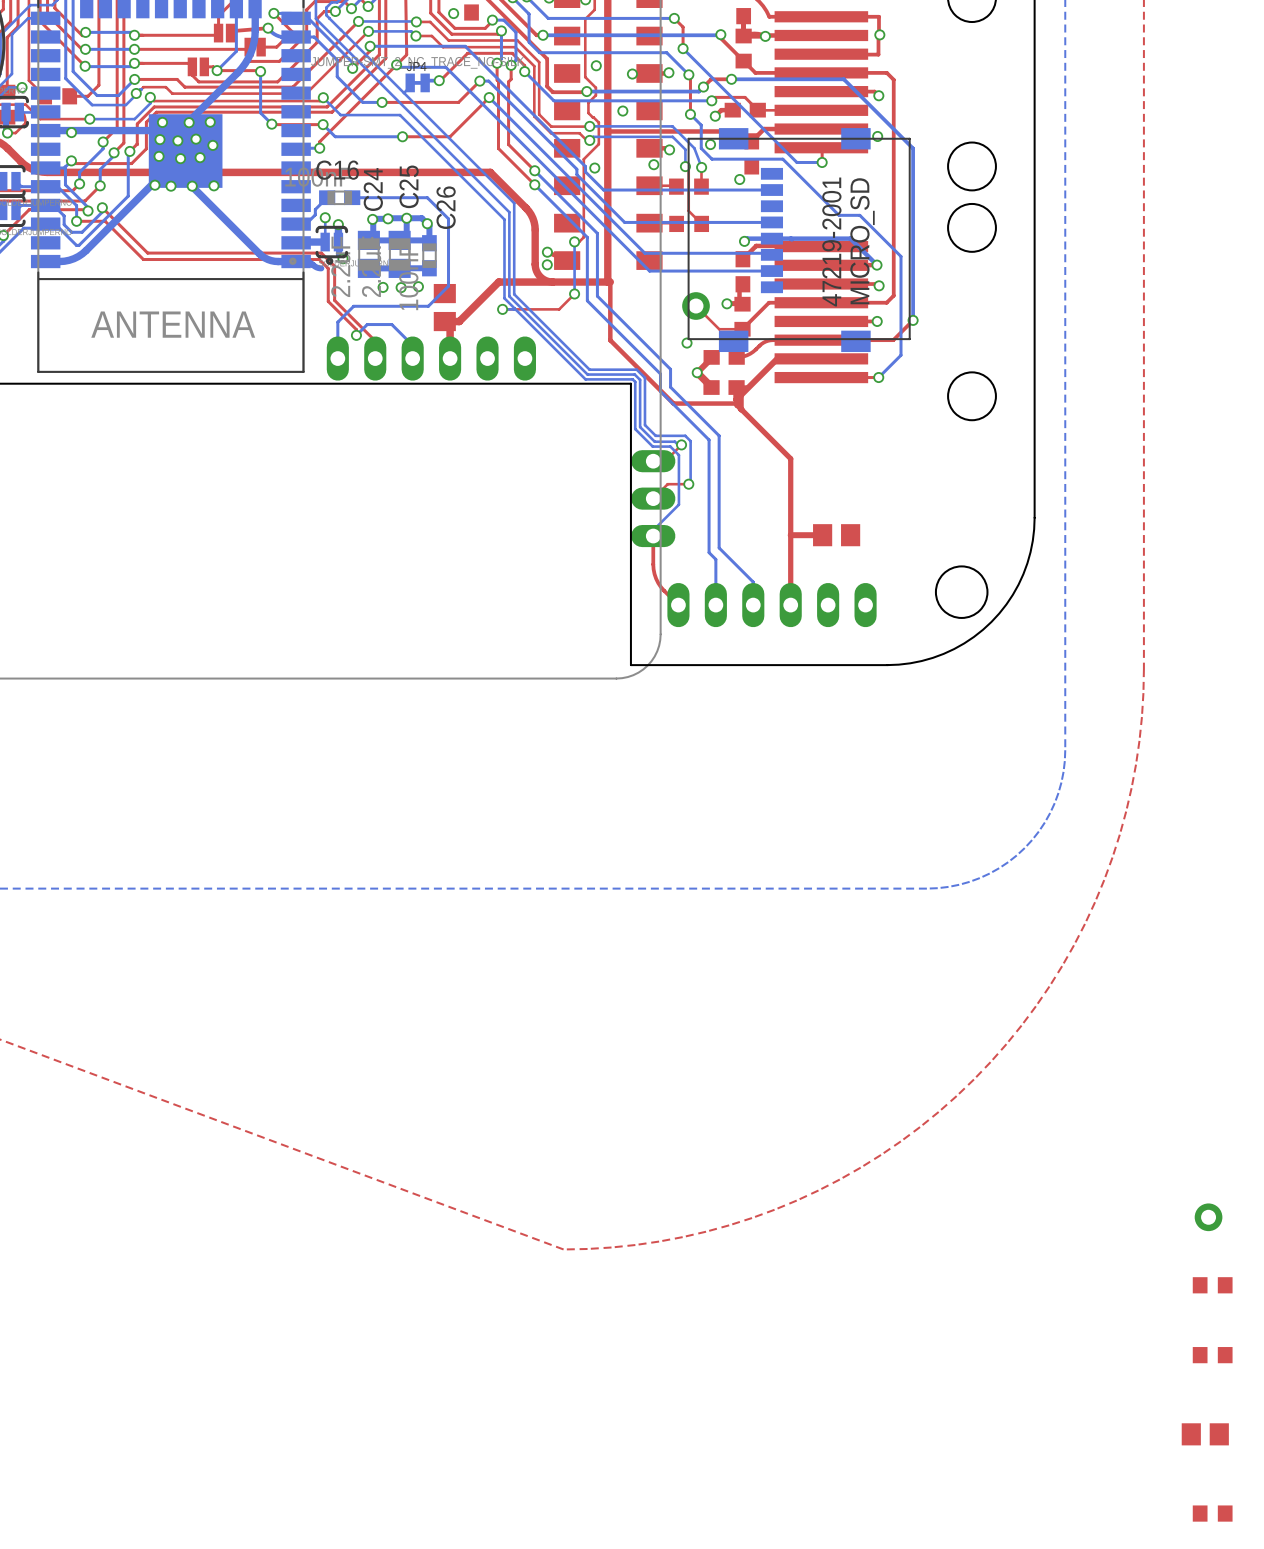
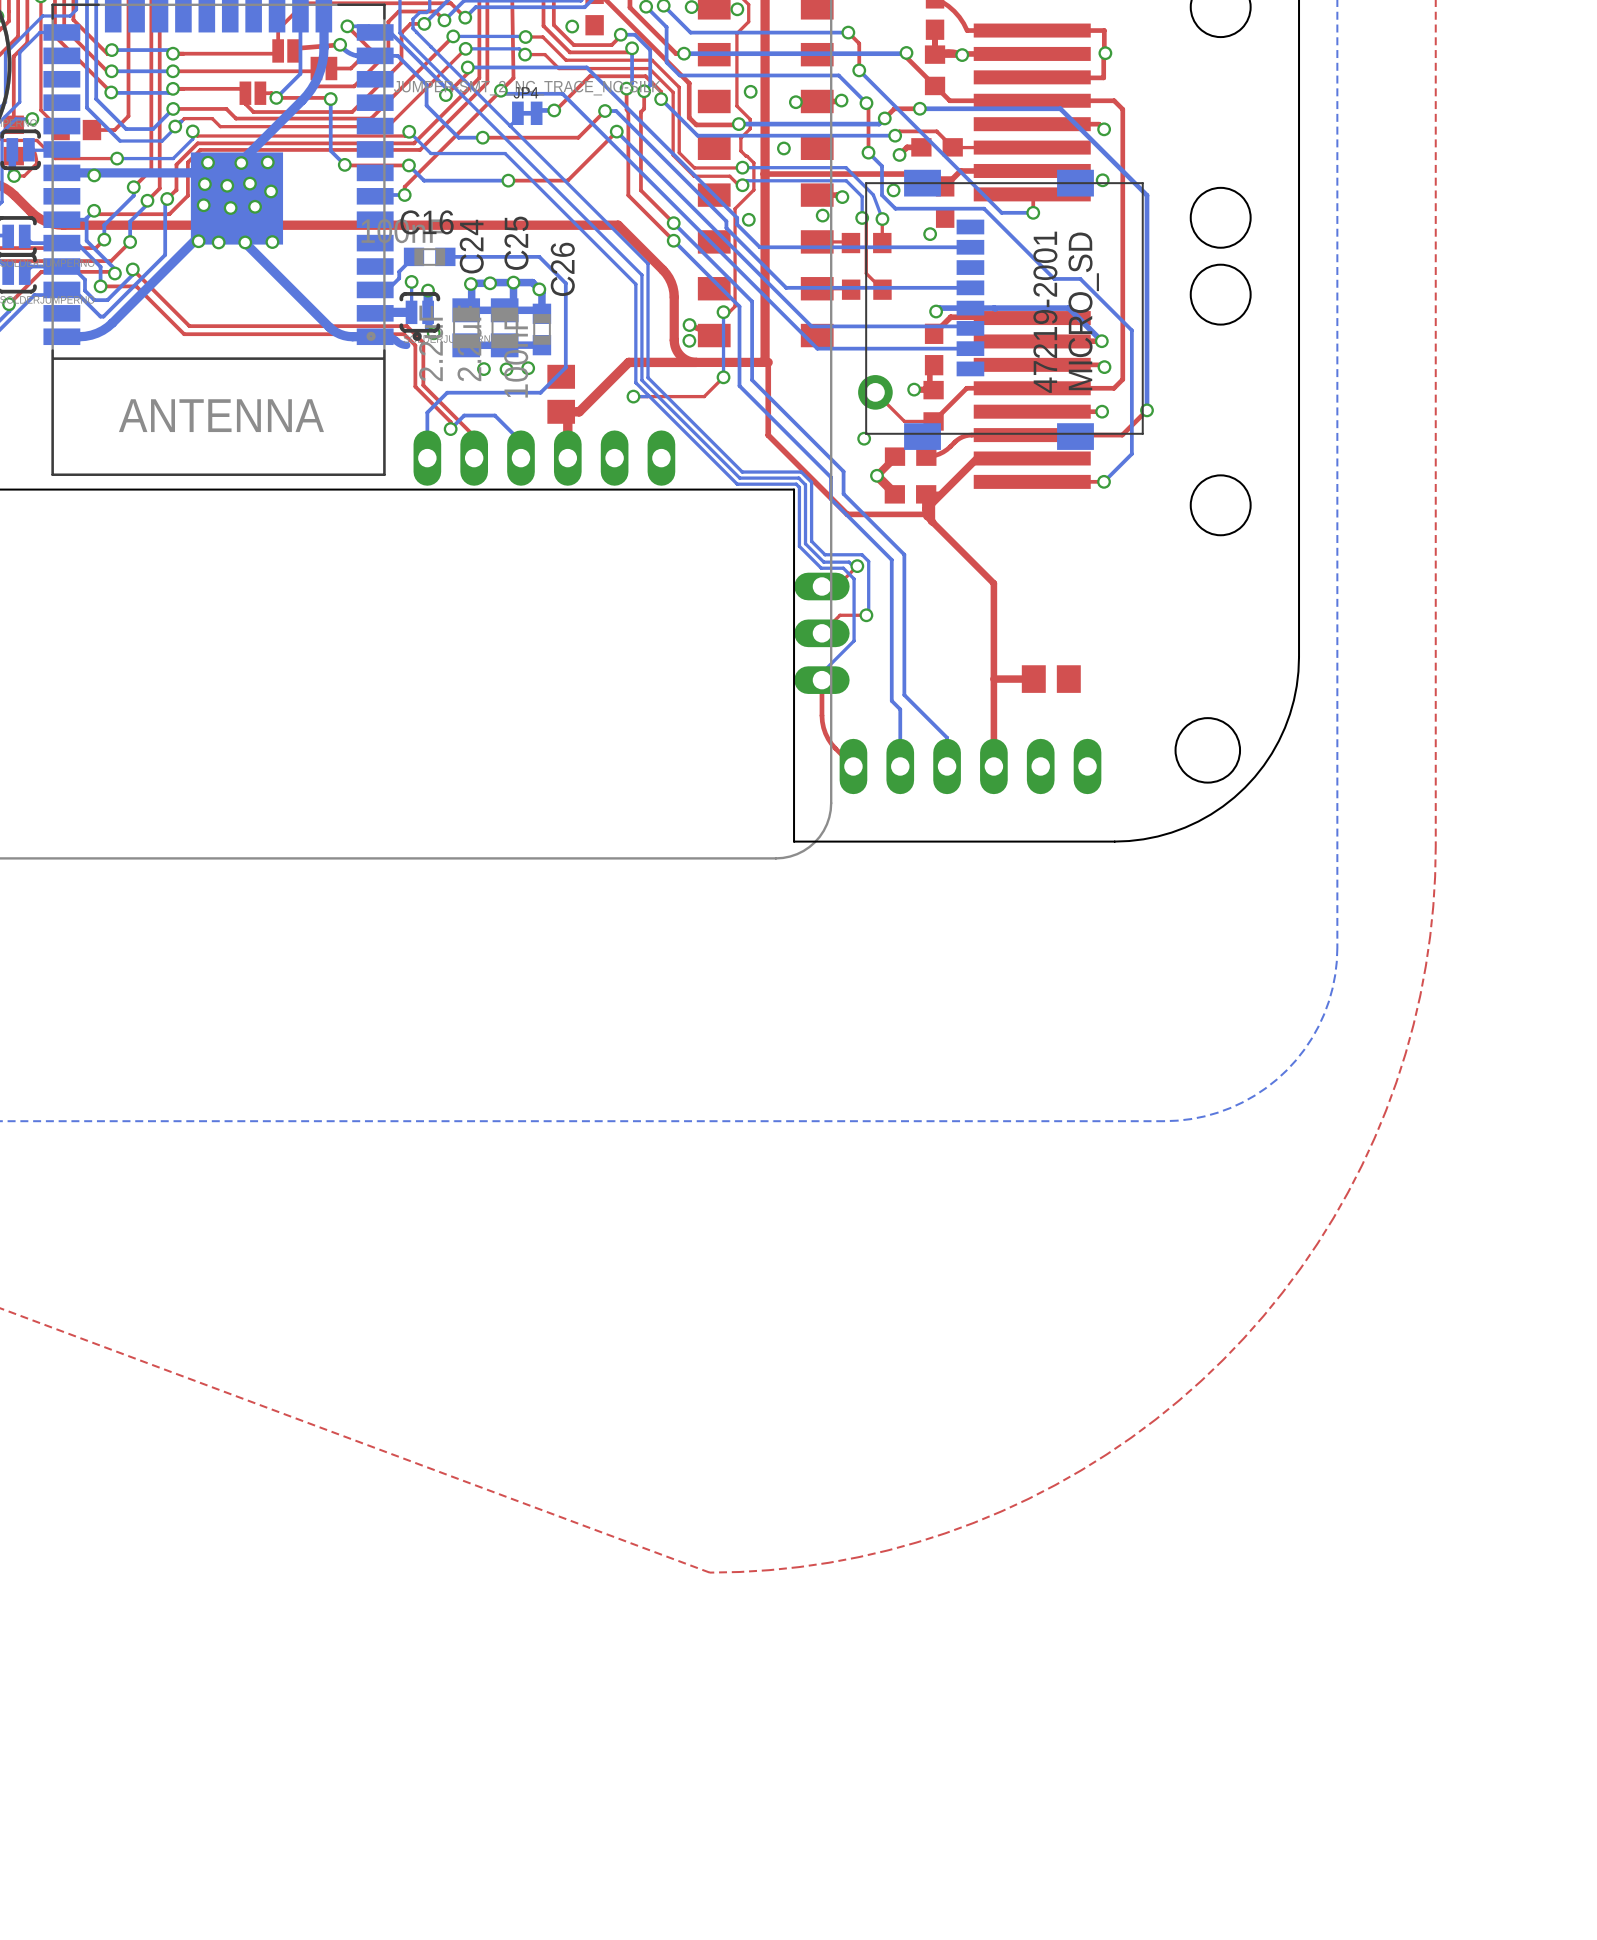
part: (1208, 1217) -> none
part: (1212, 1285) -> none
part: (1212, 1355) -> none
part: (1205, 1434) -> none
part: (1212, 1513) -> none

